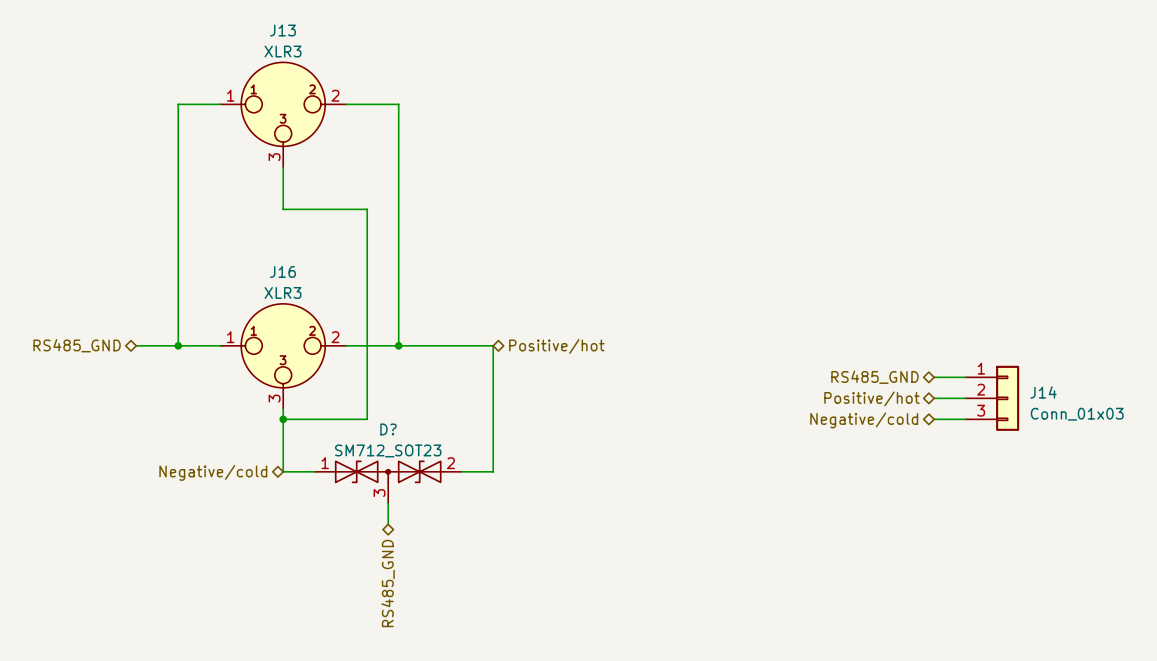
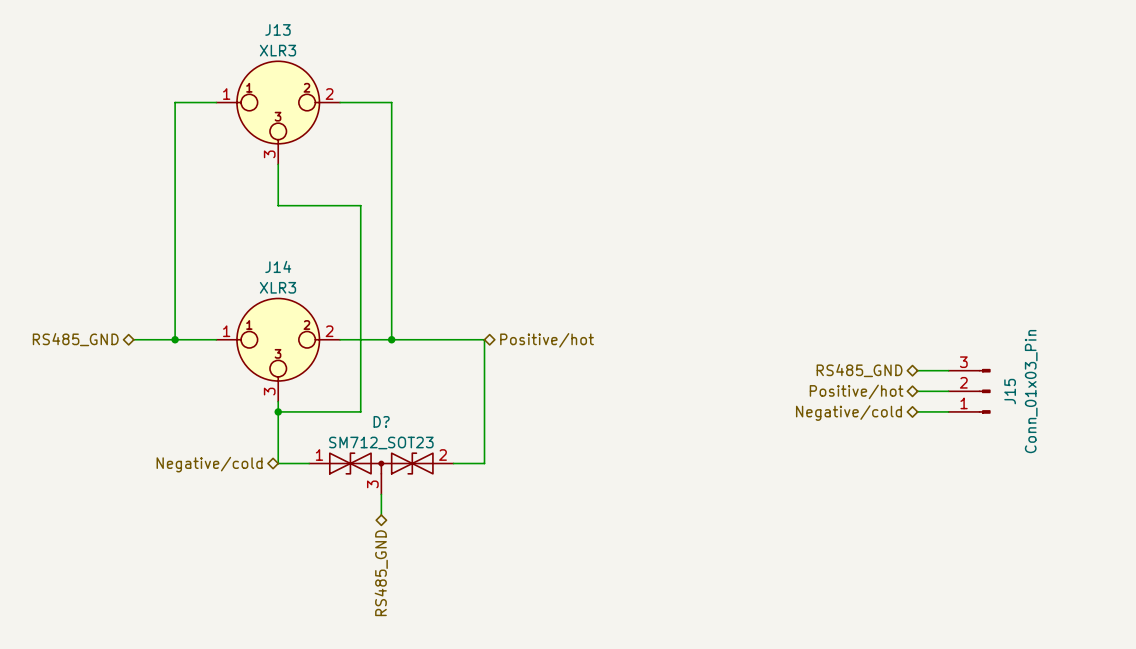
J16 name: J16 (282, 271) -> J14 (278, 266)
J15: none -> Conn_01x03_Pin (969, 391)
J14: Conn_01x03 (992, 398) -> none

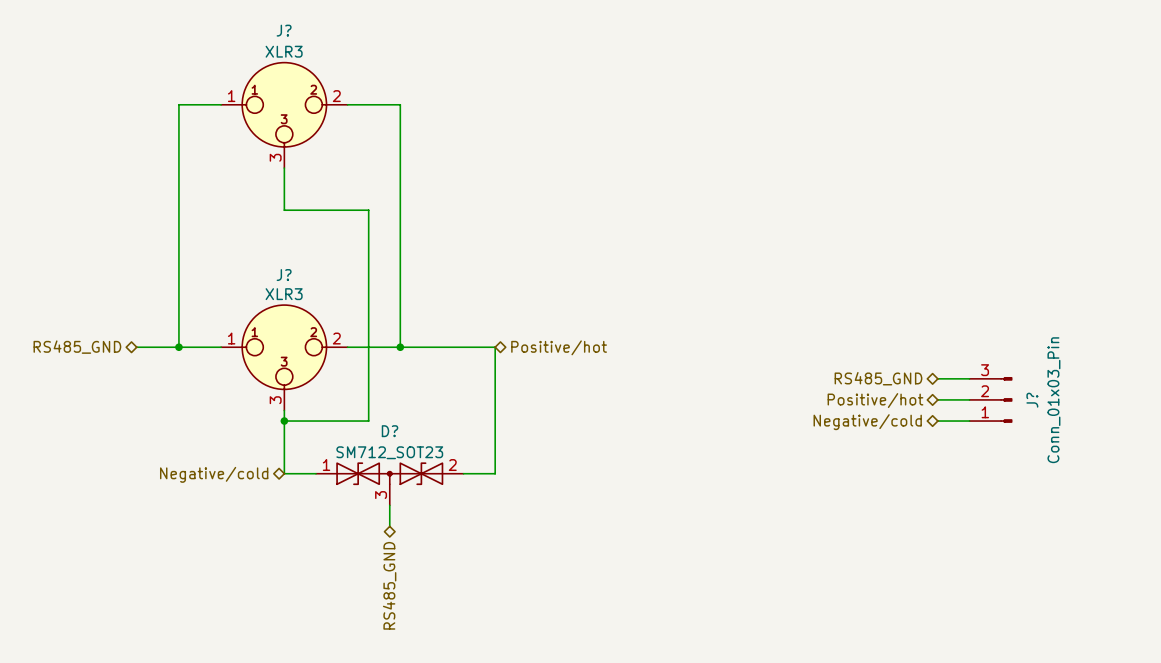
J13 name: J13 (277, 29) -> J? (284, 30)
J14 name: J14 (278, 266) -> J? (284, 275)
J15 name: J15 (1010, 391) -> J? (1032, 400)

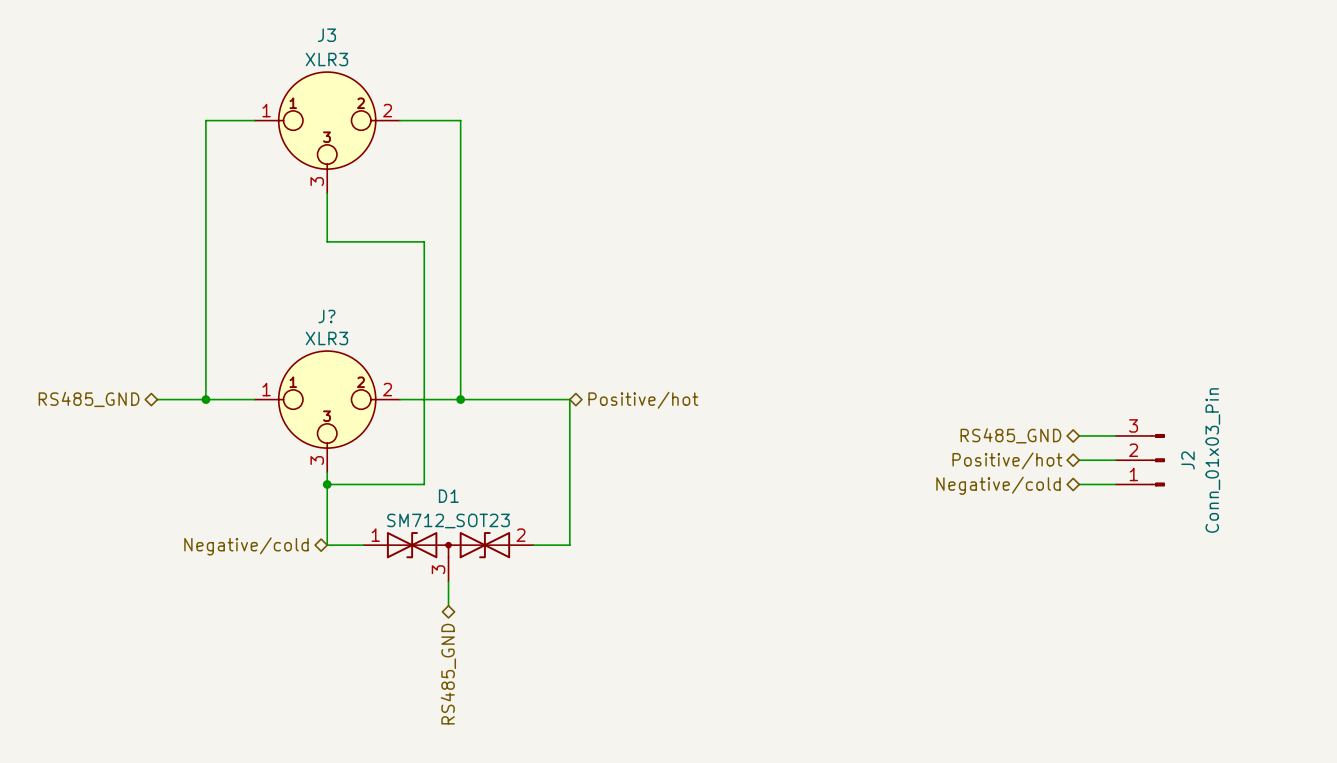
J? name: J? (284, 30) -> J3 (326, 35)
J? name: J? (1032, 400) -> J2 (1187, 460)
D? name: D? (390, 431) -> D1 (448, 496)

